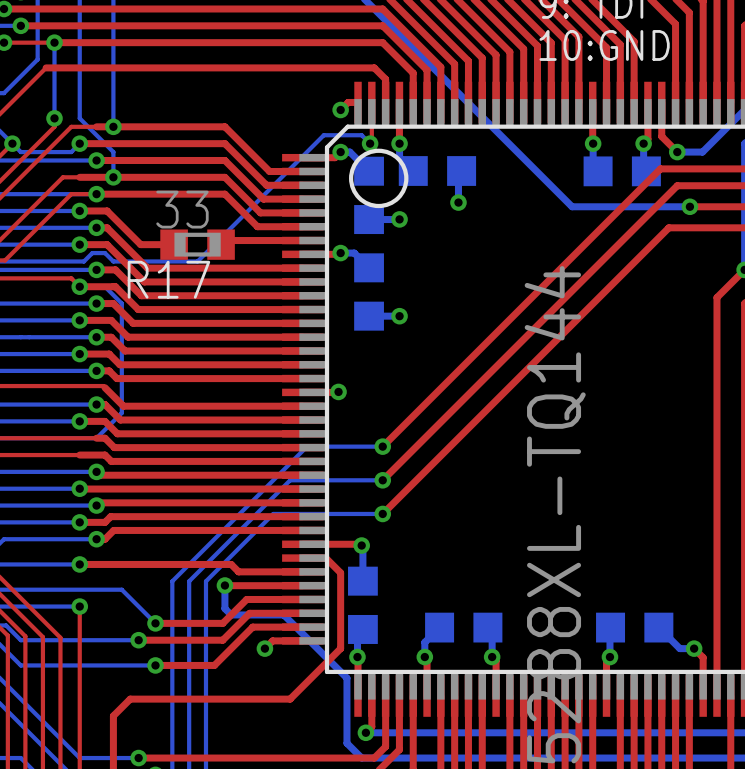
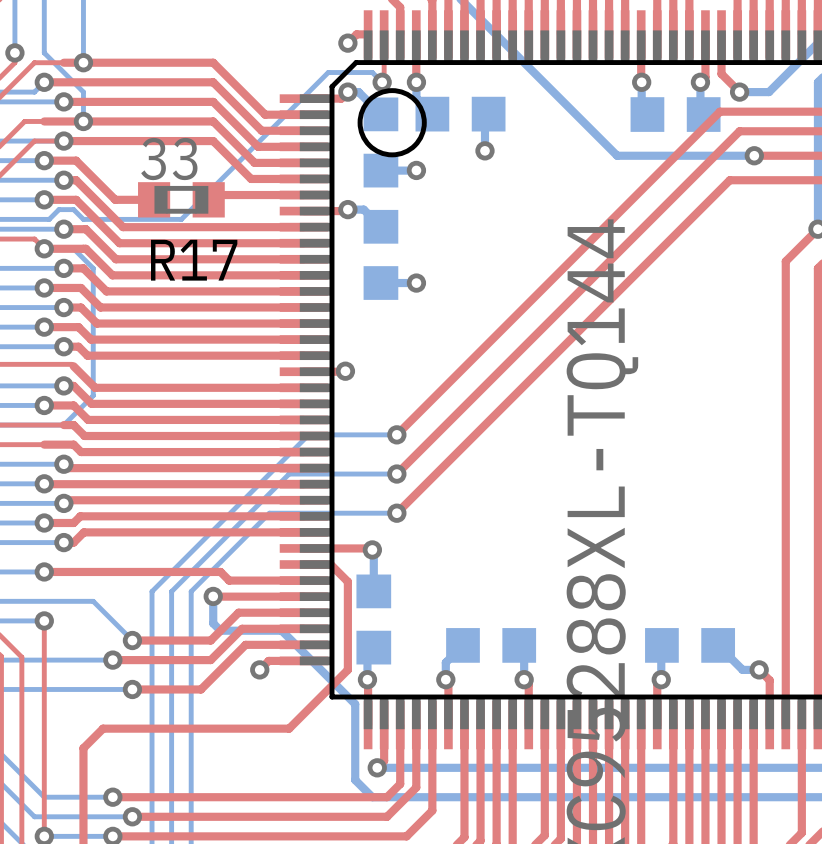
R17 name position: R17 (168, 279) -> R17 (194, 260)

